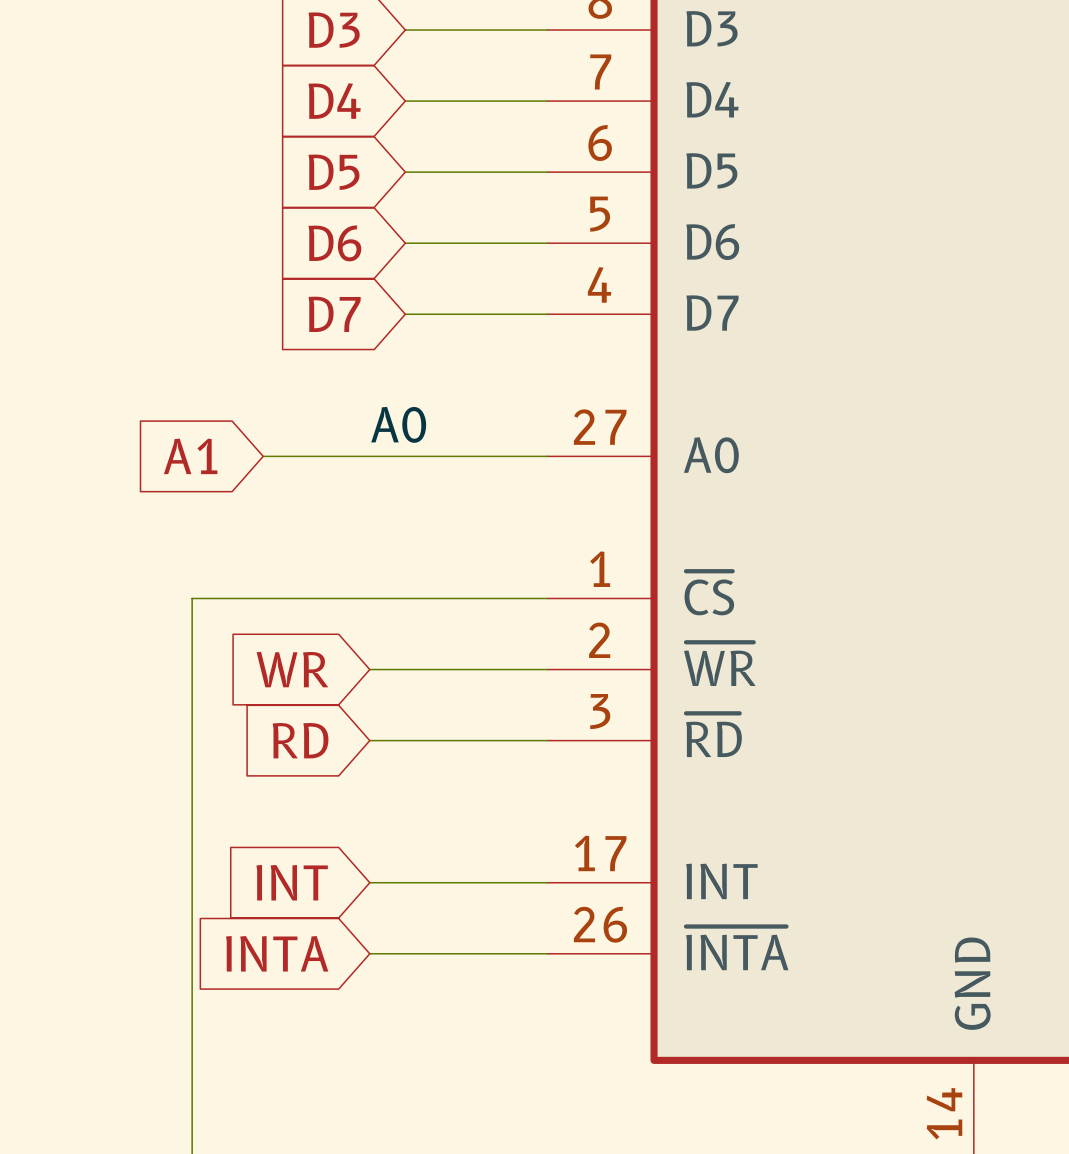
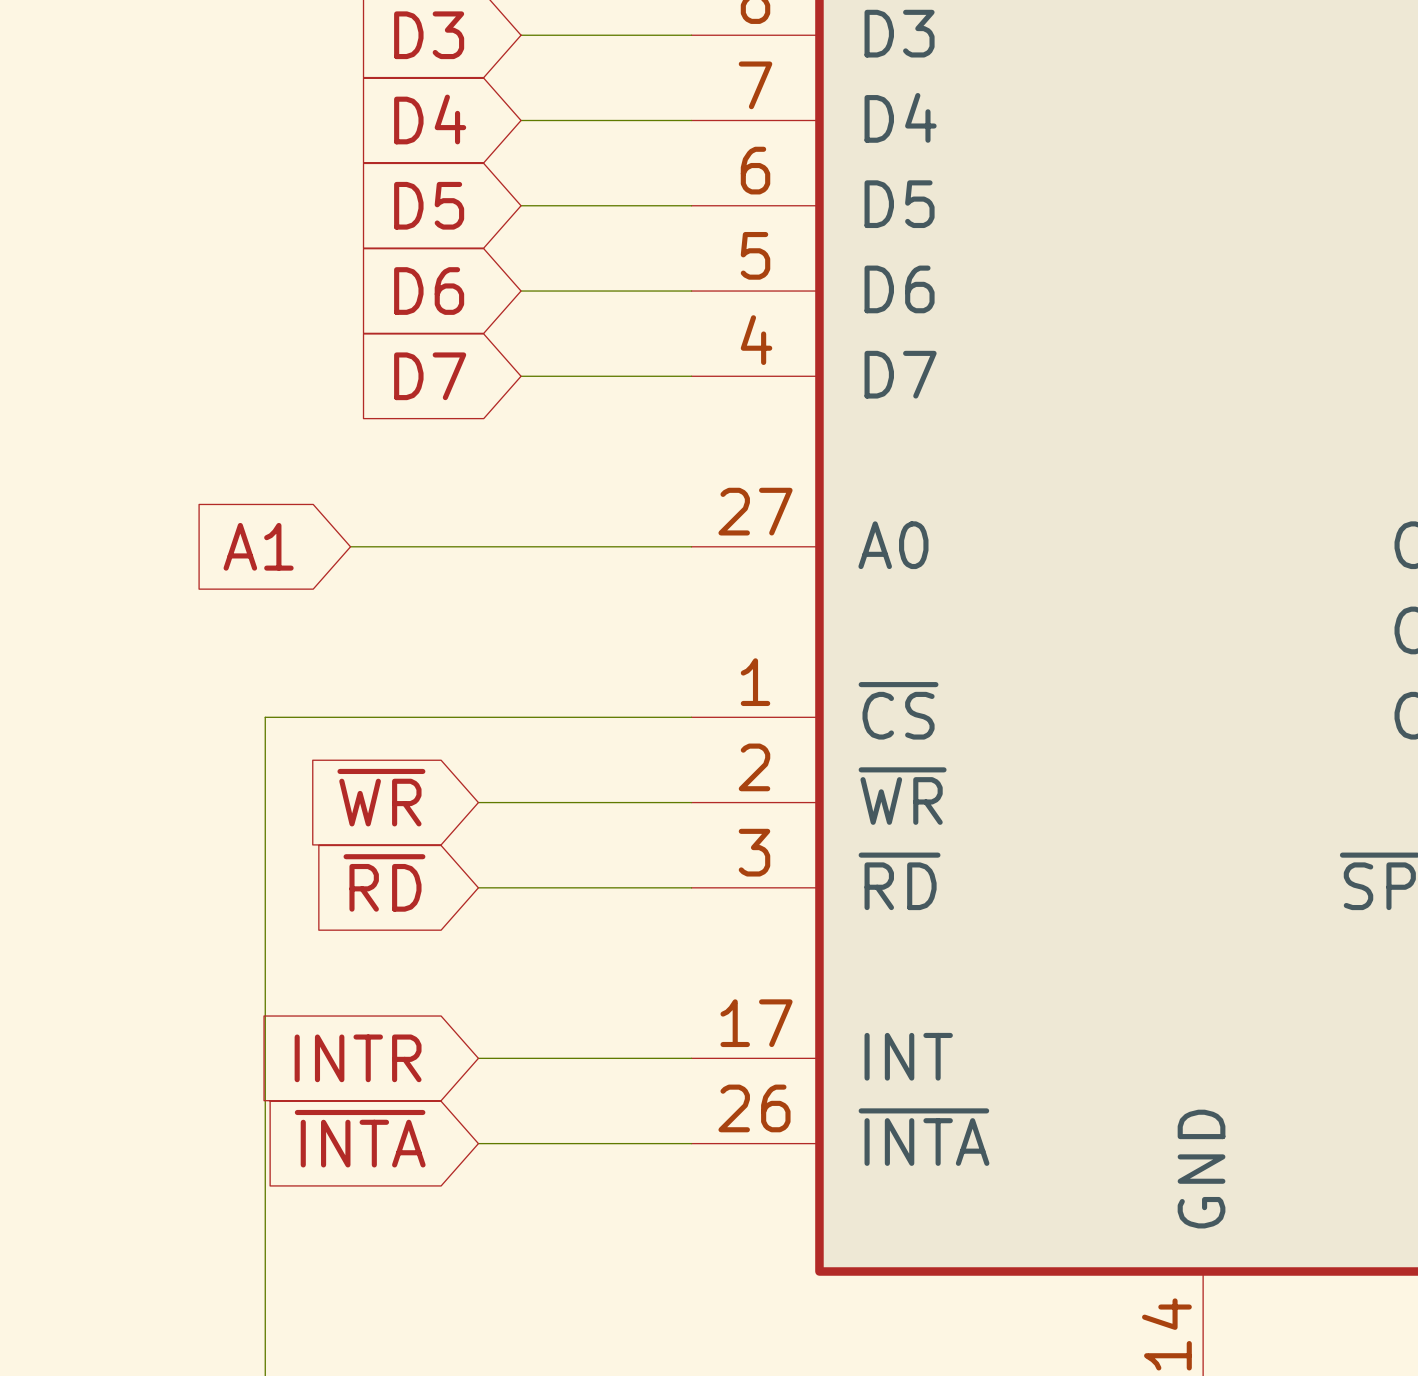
label: A0 (398, 424) -> none
global label: WR (292, 669) -> ~{WR} (381, 797)
global label: RD (300, 740) -> ~{RD} (384, 882)
global label: INT (292, 882) -> INTR (358, 1058)
global label: INTA (277, 953) -> ~{INTA} (360, 1138)

